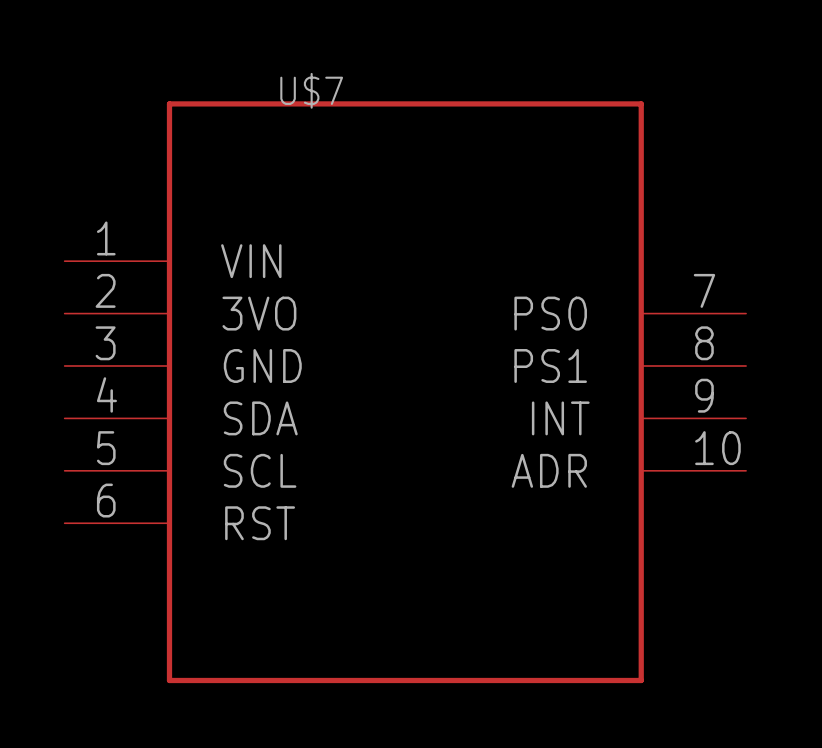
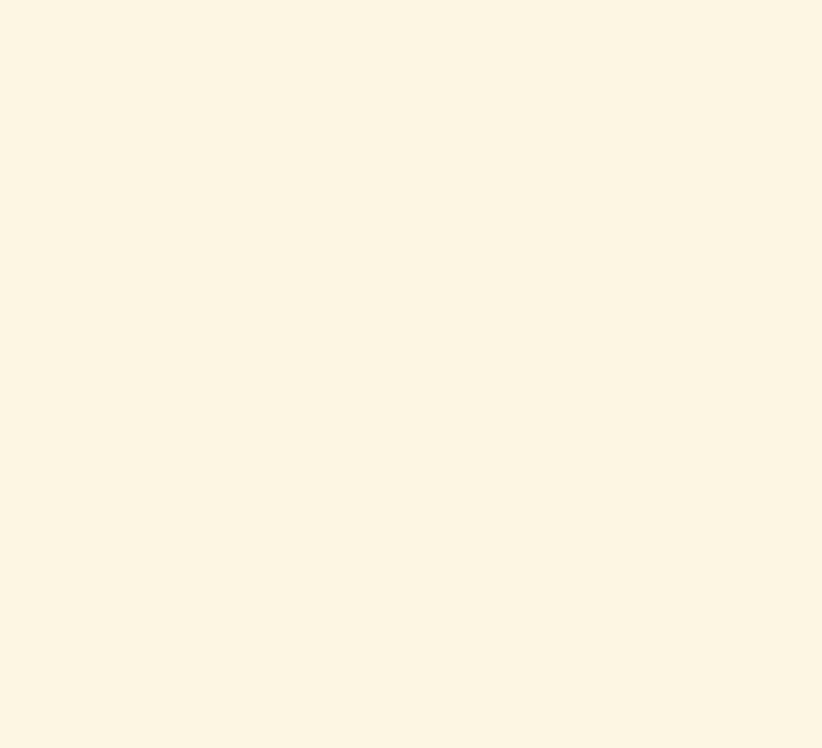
U$7: (405, 392) -> none

